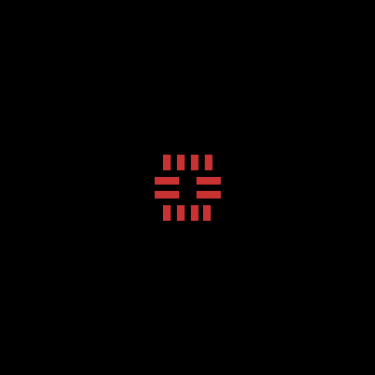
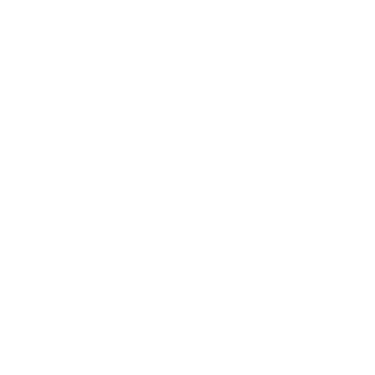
part: (187, 187) -> none

